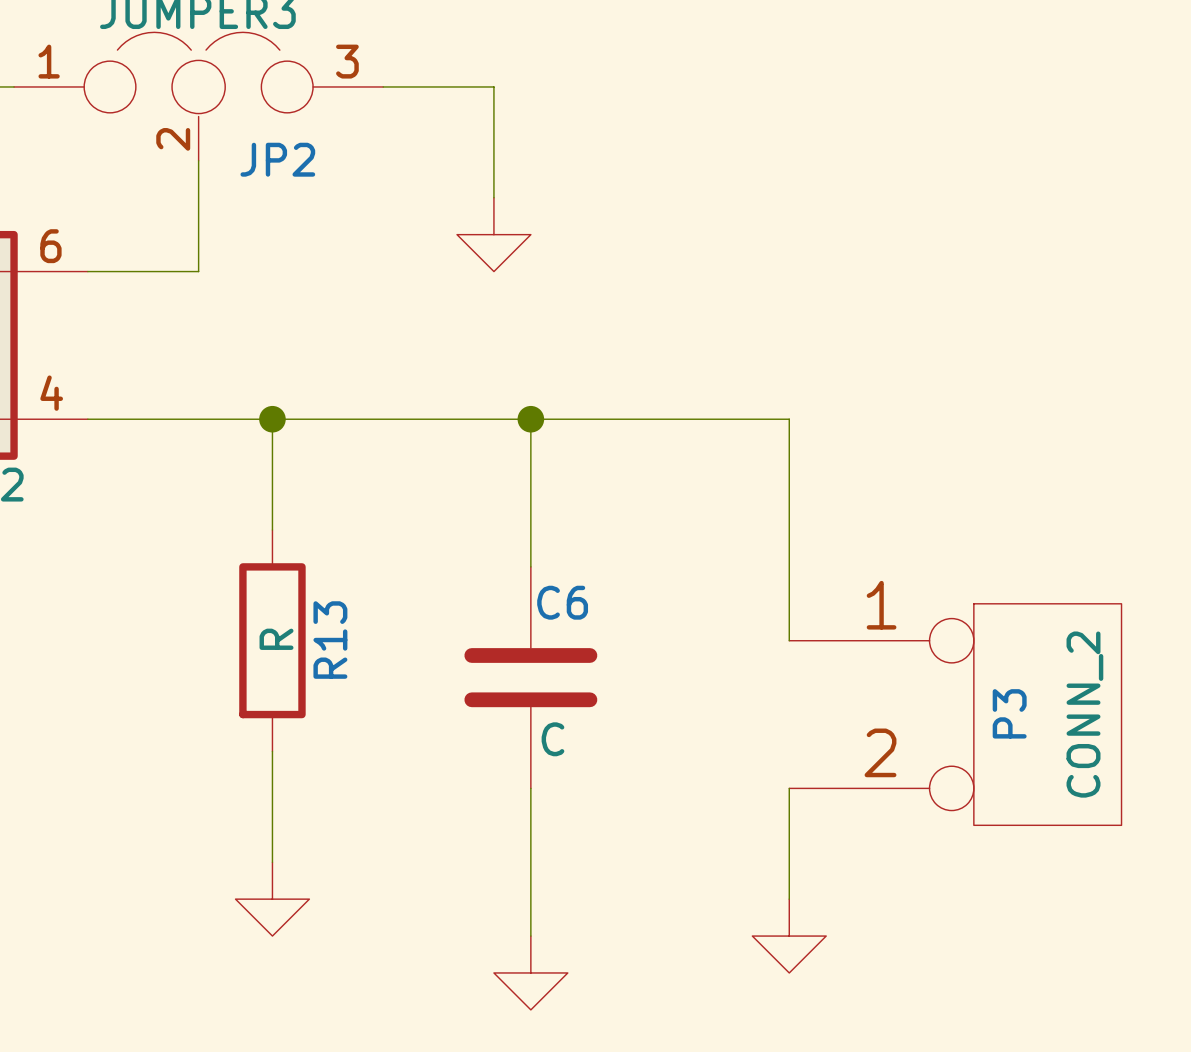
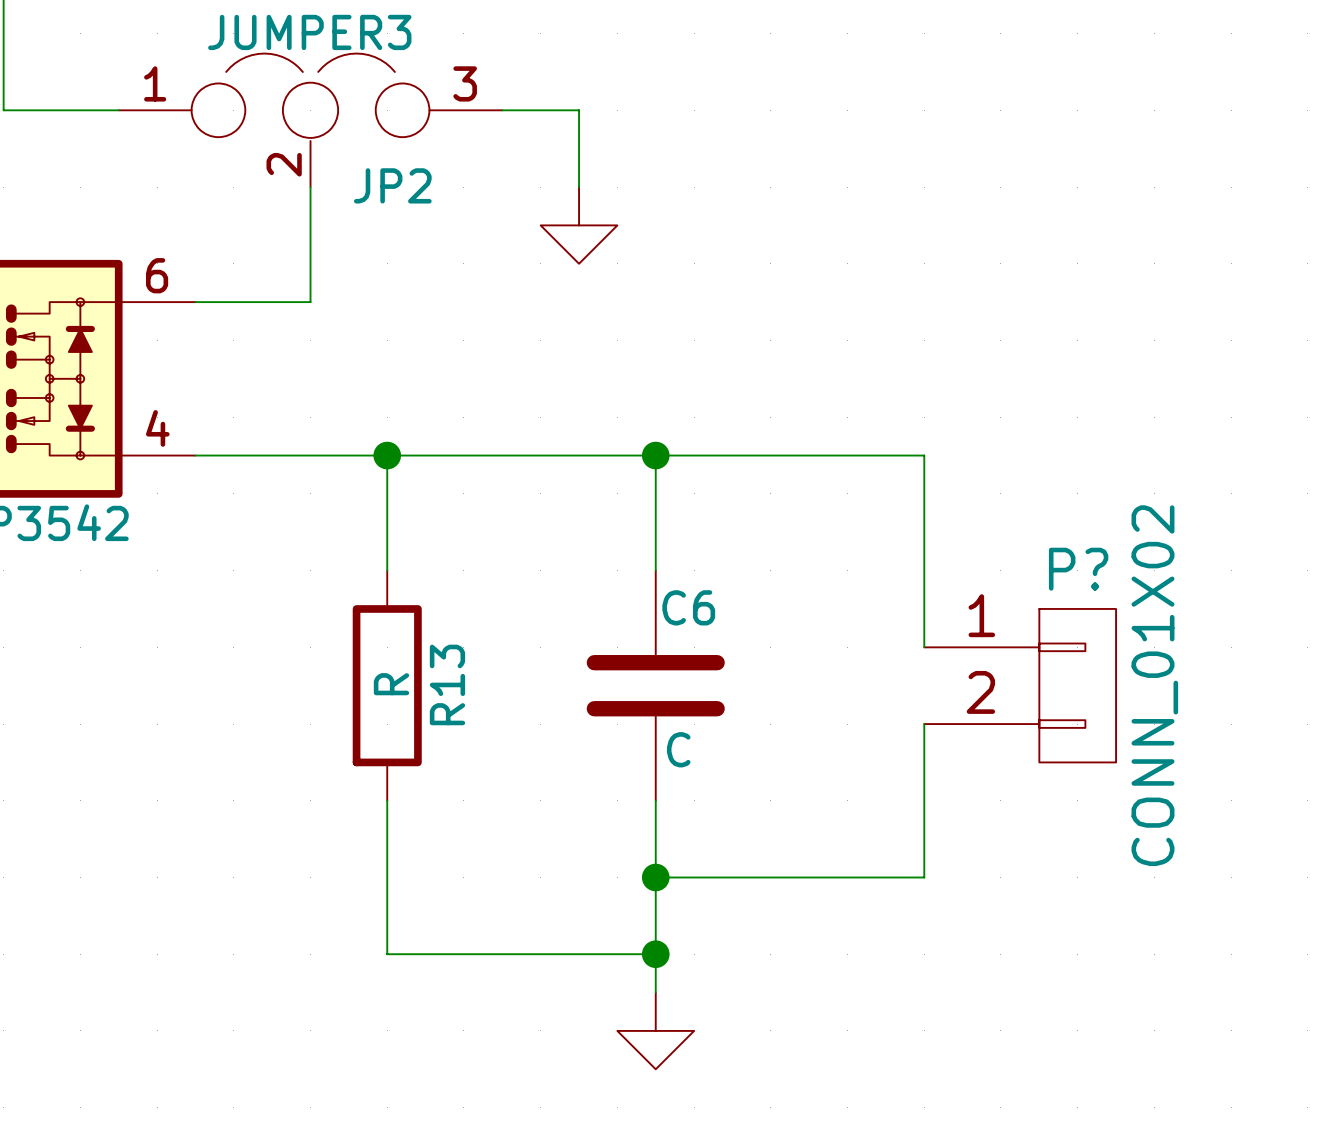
wire: (457, 86) (493, 86) (493, 197) -> (579, 110) (579, 187)
power symbol position: (493, 234) -> (579, 225)
wire: (789, 603) (789, 640) -> none
P?: none -> CONN_01X02 (1020, 685)
C6 position: (530, 677) -> (655, 685)
wire: none -> (924, 724) (924, 839)
P3: CONN_2 (955, 714) -> none
junction: none -> (655, 877)
wire: (789, 825) (789, 899) -> (924, 877) (655, 877)
wire: none -> (387, 915) (387, 954) (655, 954)
power symbol: (272, 899) -> none
junction: none -> (655, 954)
power symbol: (789, 936) -> none

